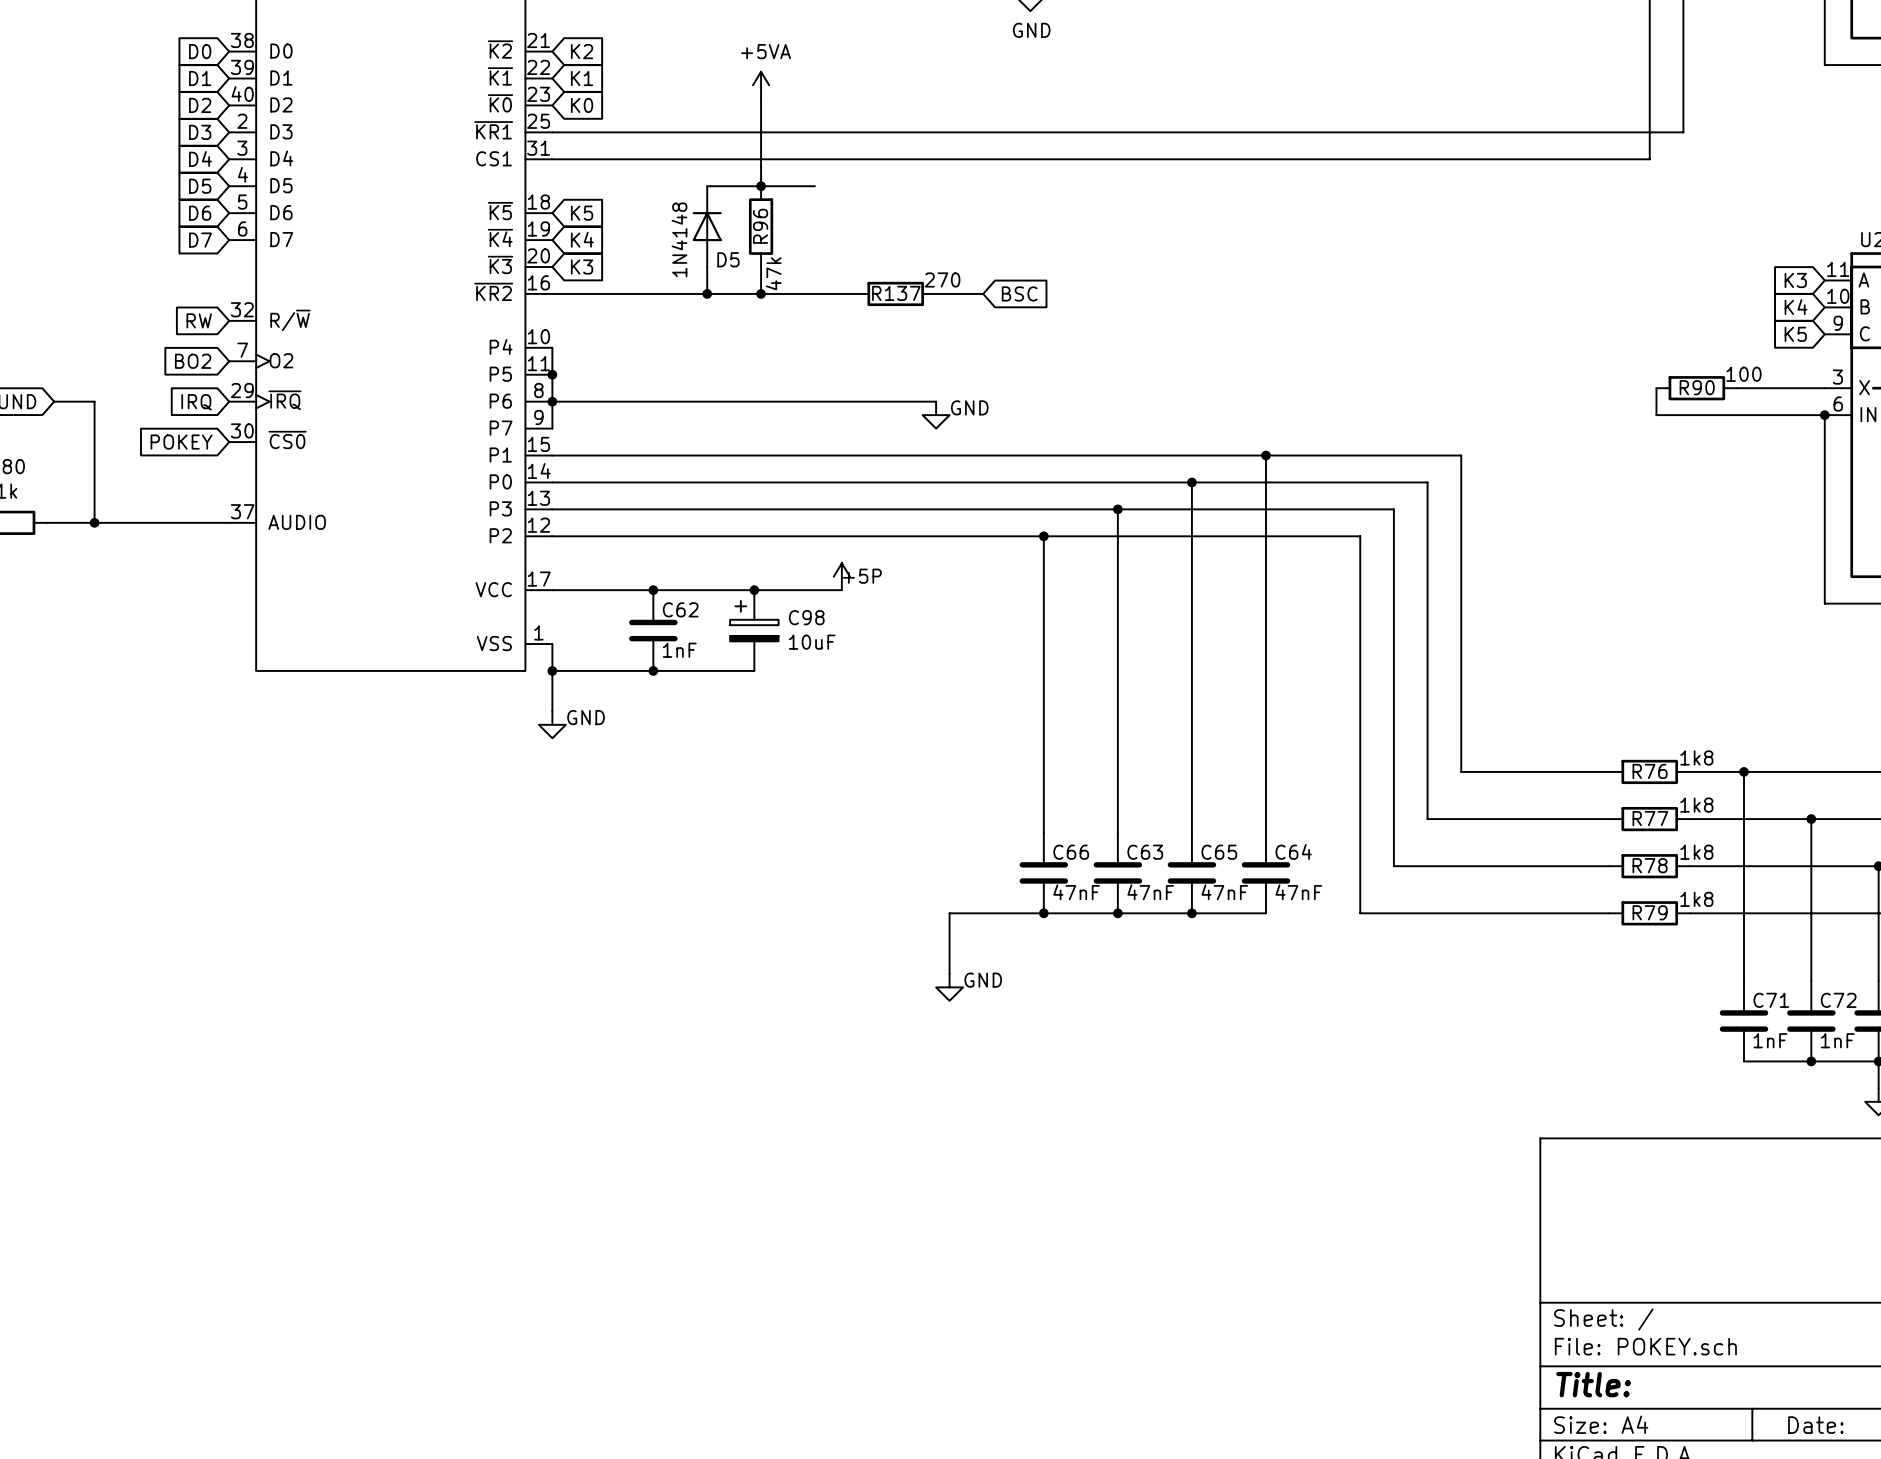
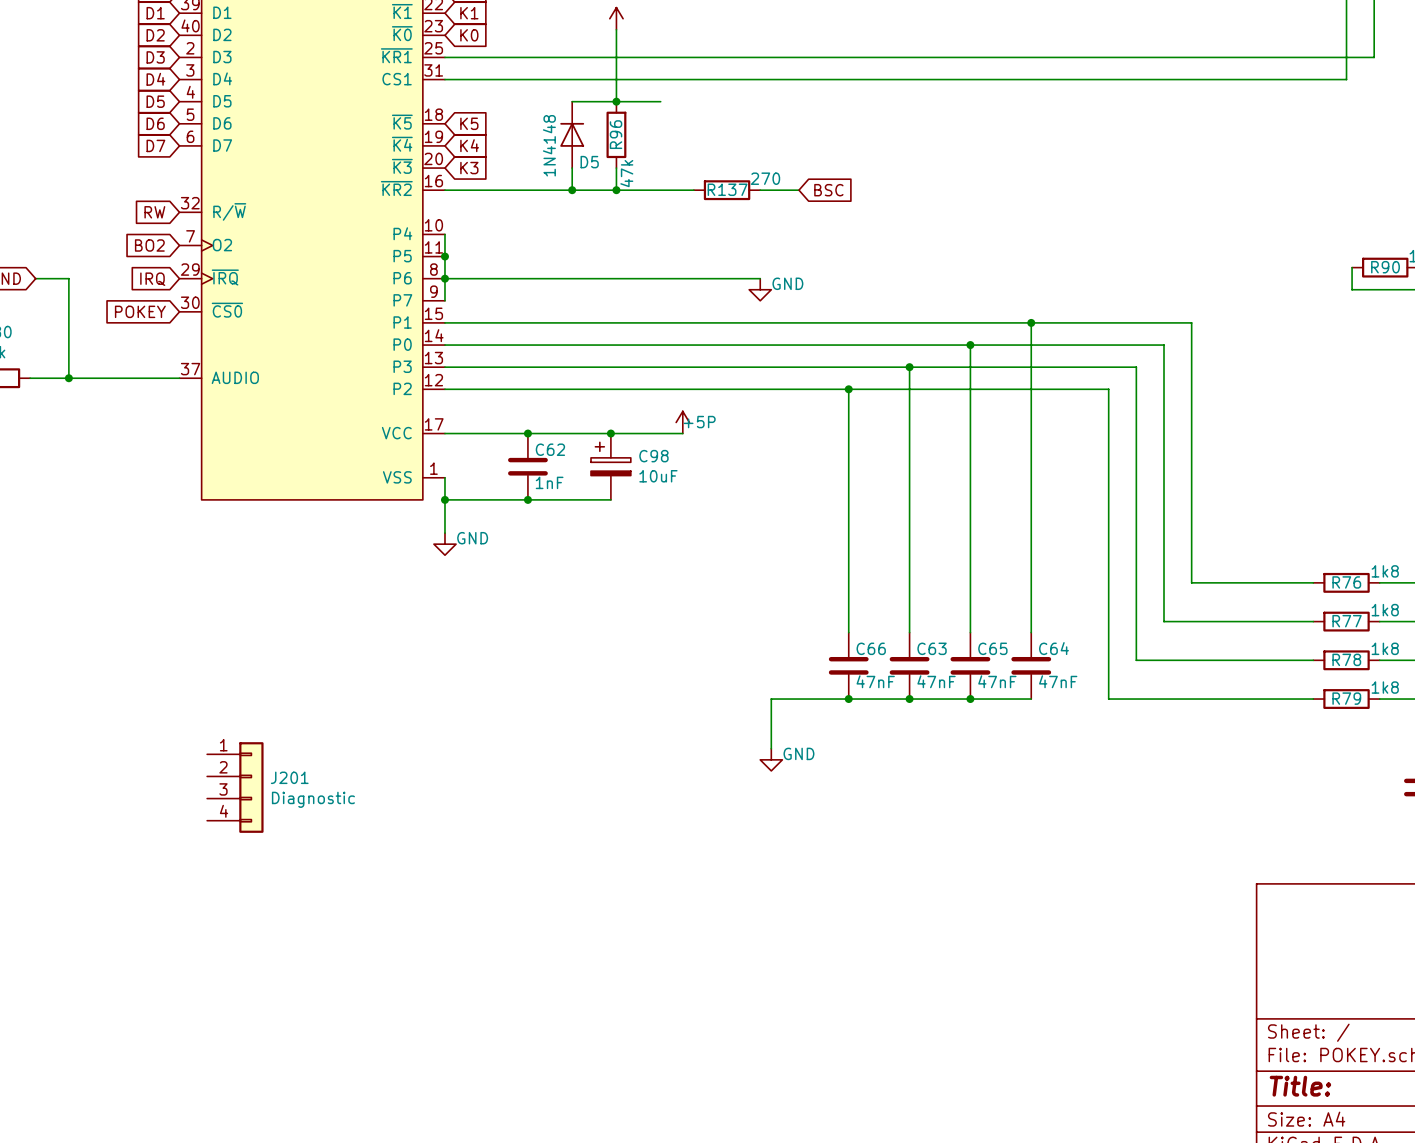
J201: none -> Diagnostic (235, 787)

